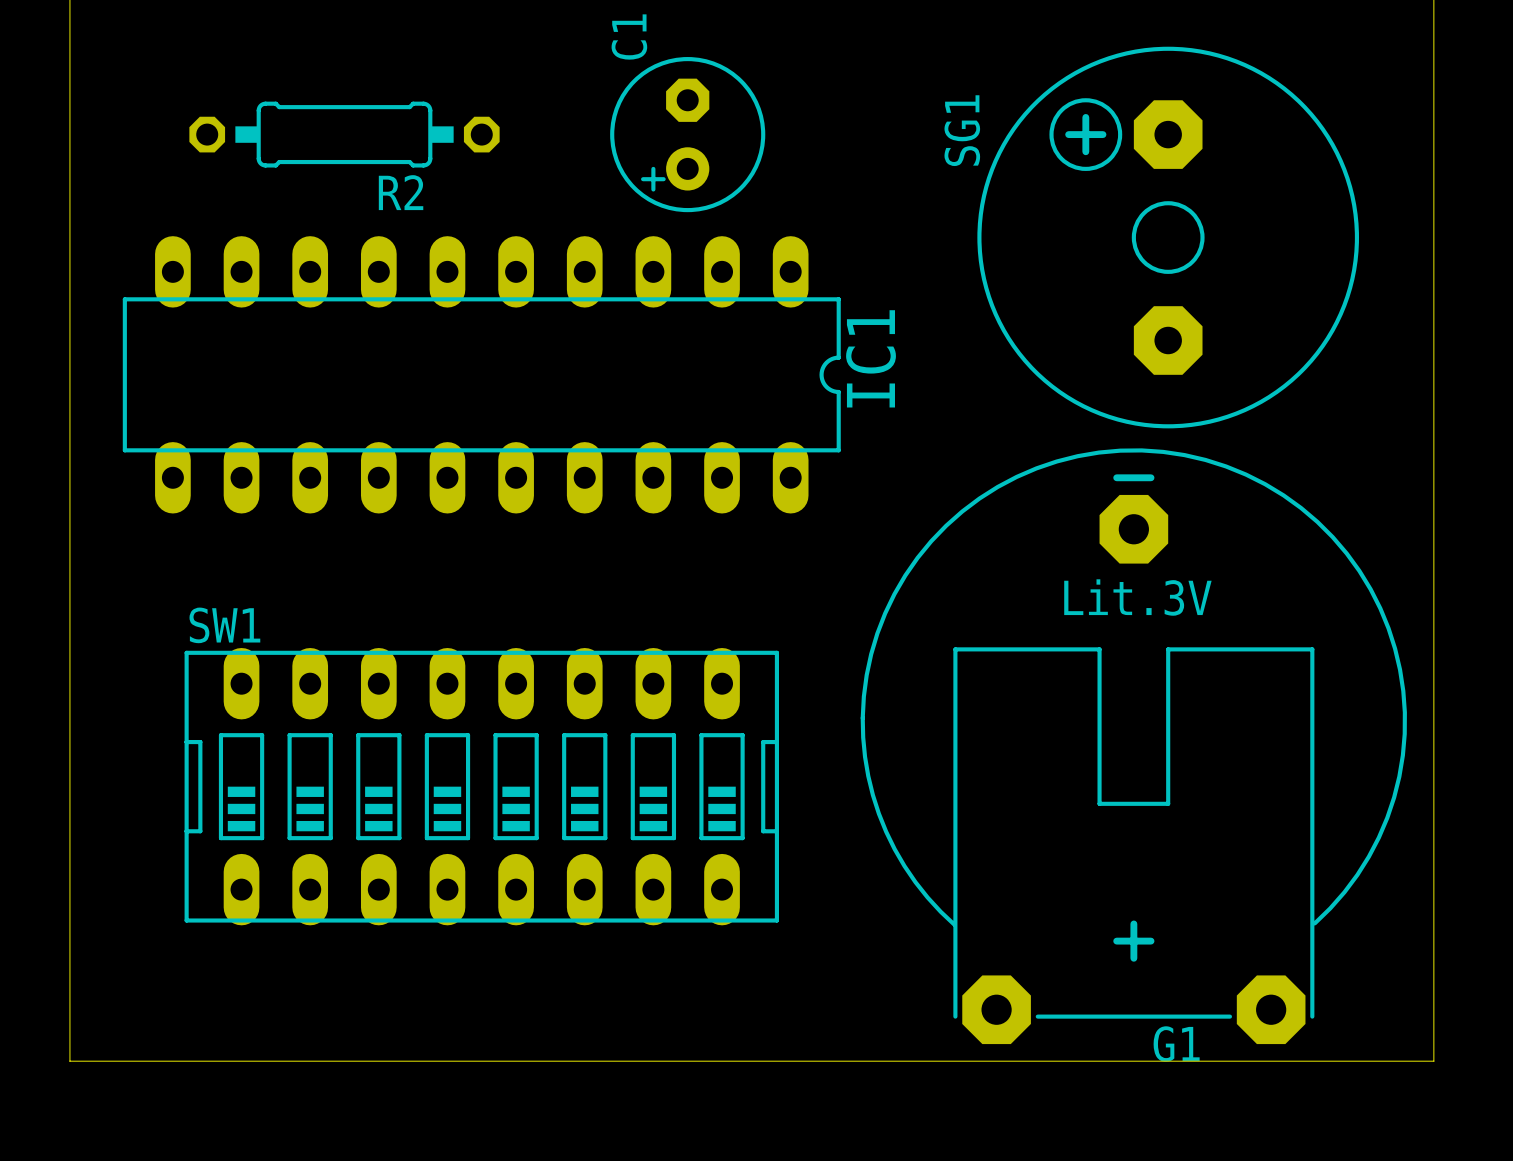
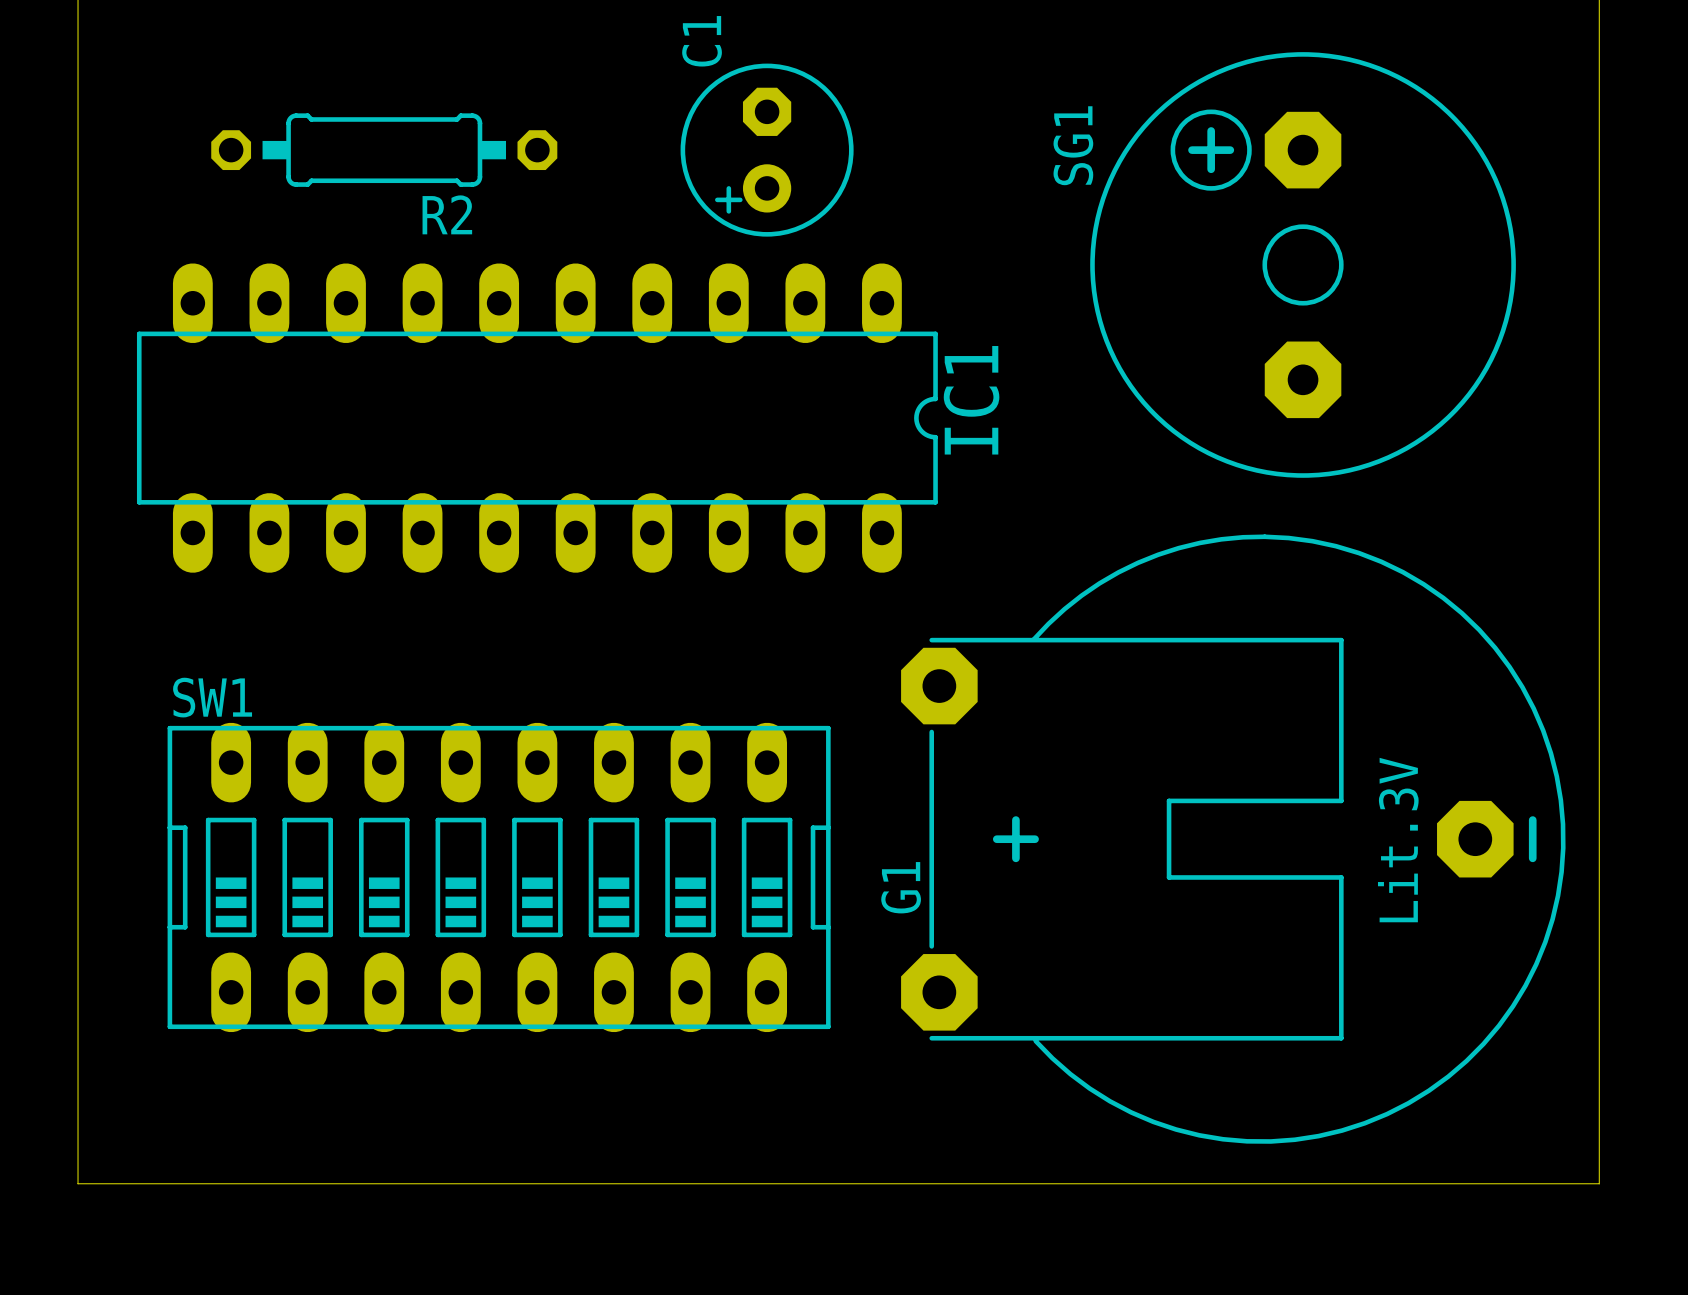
G1 footprint: [860, 448, 1407, 1045] -> [901, 534, 1566, 1144]
SW1 position: (481, 786) -> (499, 877)
G1 name position: G1 (1176, 1044) -> G1 (901, 887)

